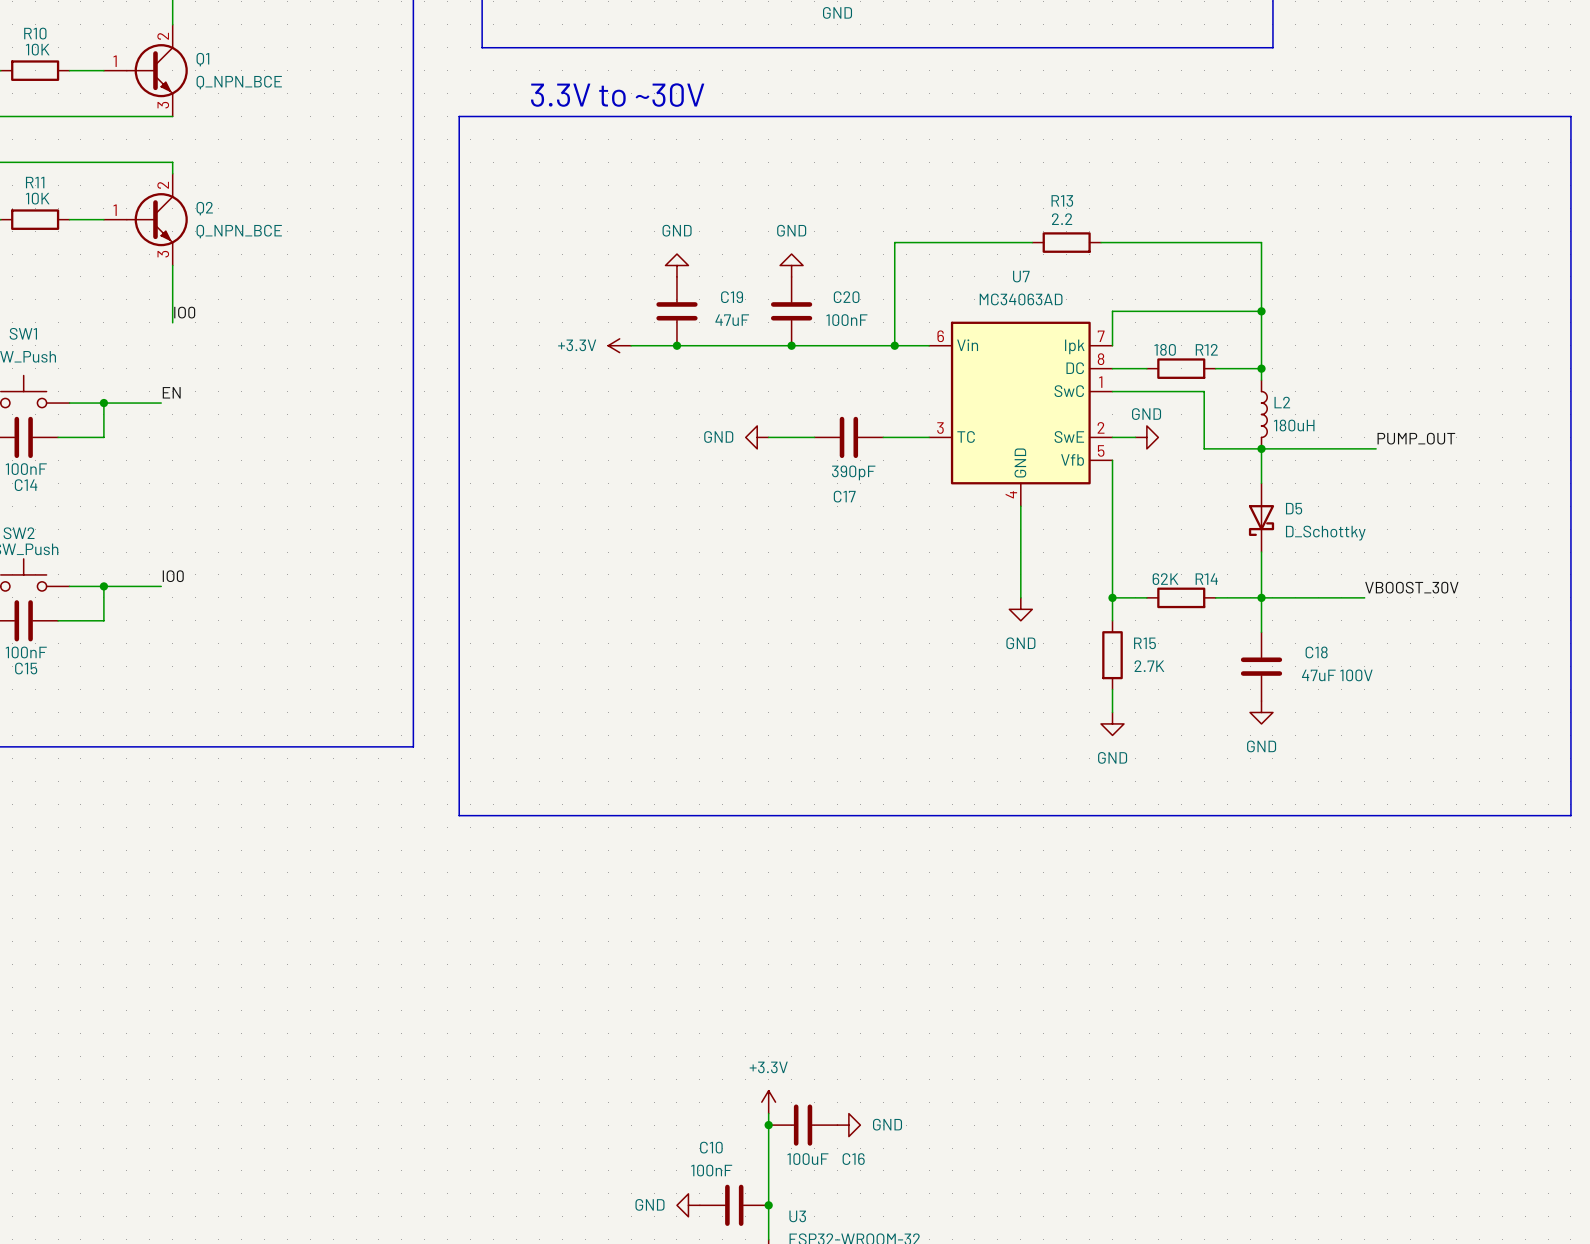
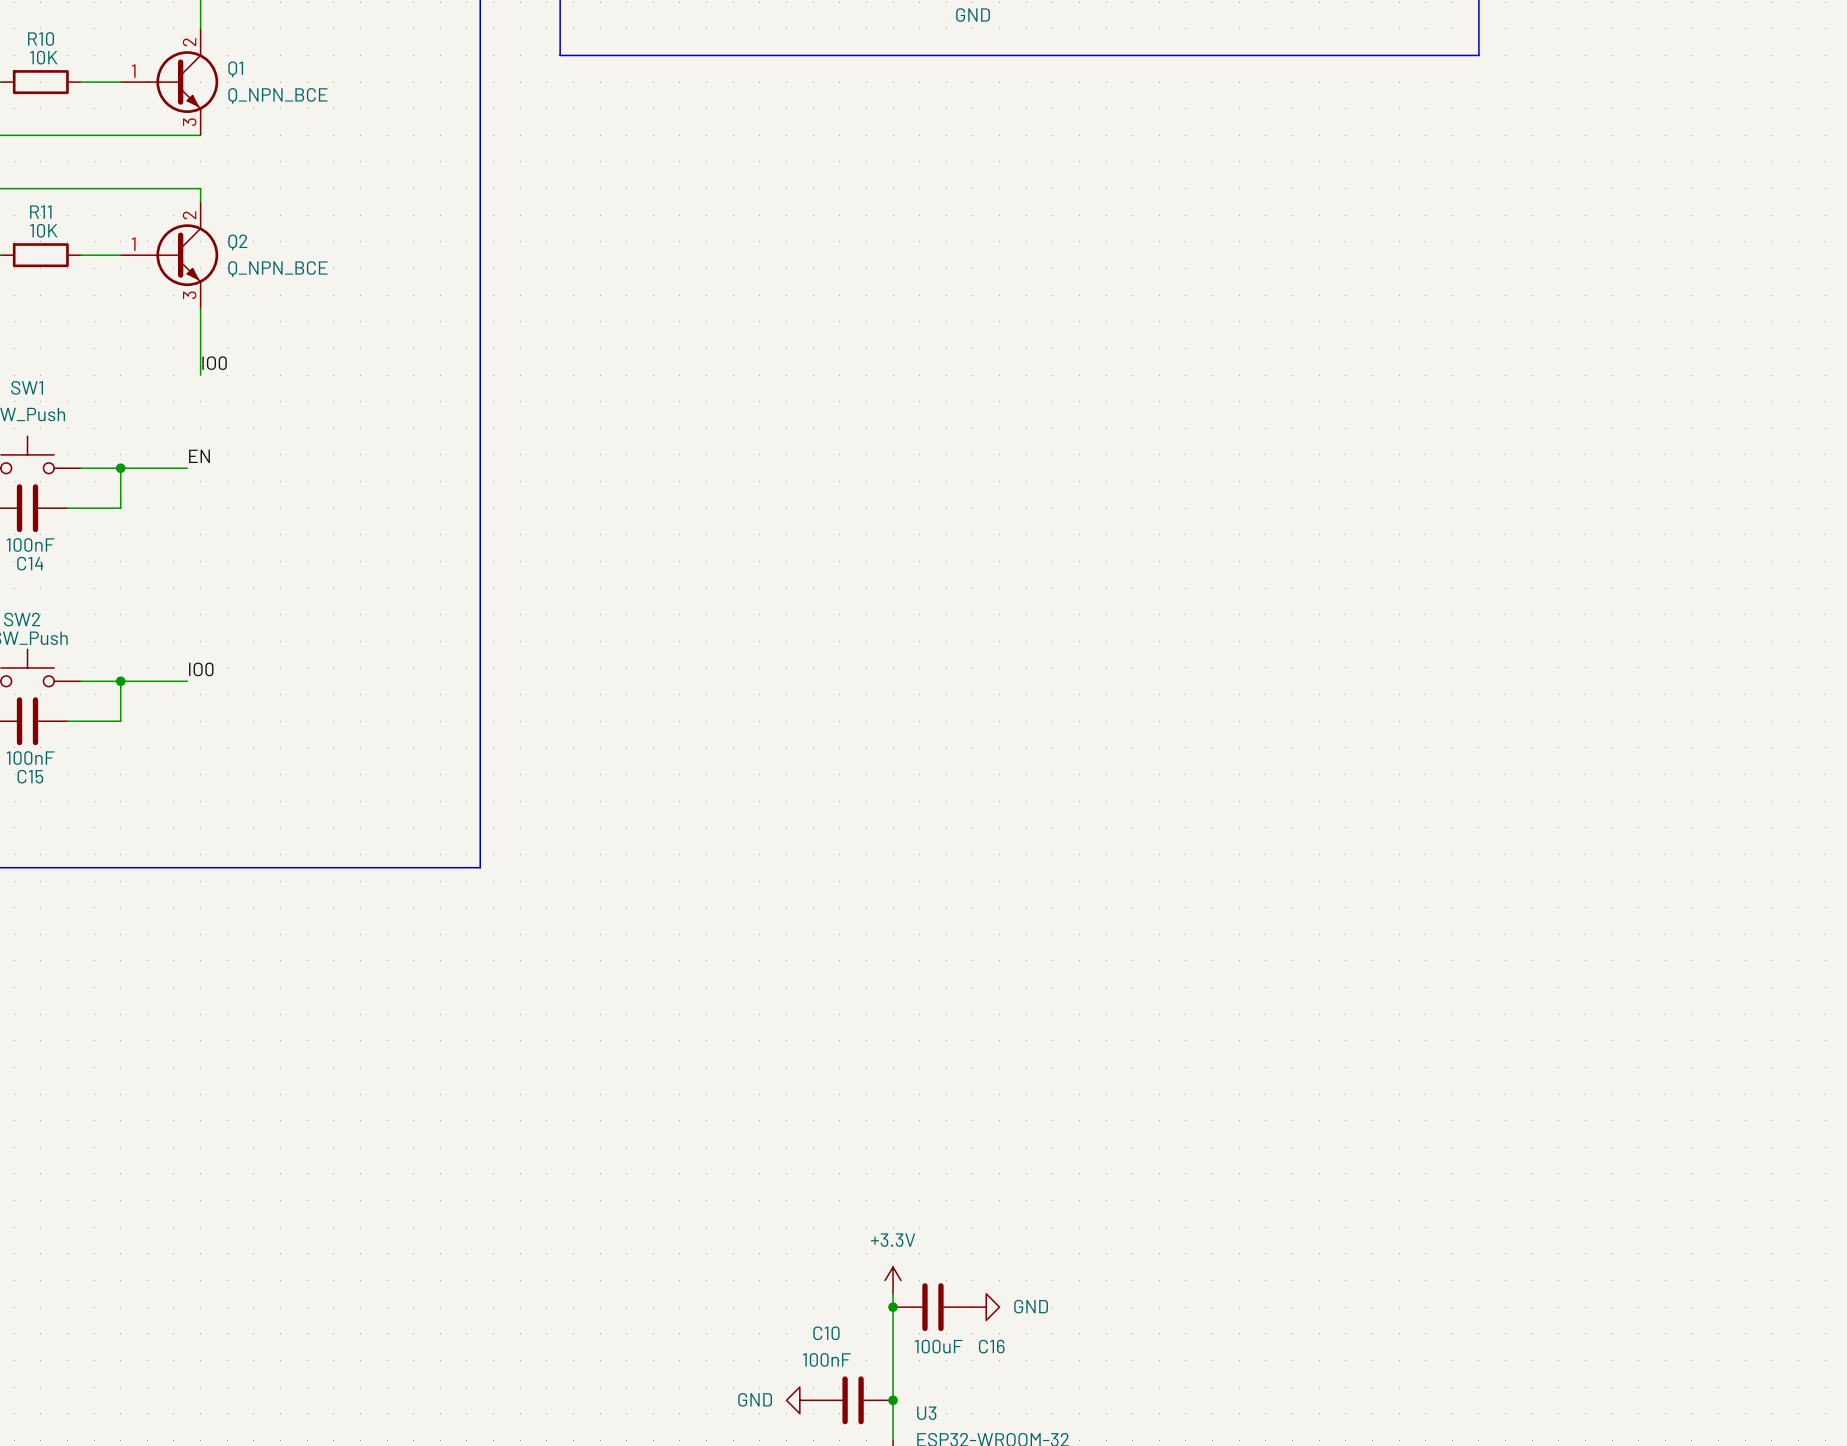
text: 3.3V to ~30V (617, 95) -> none
line: (459, 116) (1570, 116) (1570, 815) (459, 815) (459, 116) -> none
wire: (1032, 242) (894, 242) (894, 345) -> none
R13: 2.2 (1066, 242) -> none
wire: (1101, 242) (1261, 242) (1261, 380) -> none
power symbol: GND (676, 265) -> none
power symbol: GND (791, 265) -> none
C19: 47uF (676, 311) -> none
C20: 100nF (791, 311) -> none
wire: (1261, 311) (1112, 311) (1112, 345) -> none
junction: (1261, 311) -> none
power symbol: +3.3V (619, 345) -> none
wire: (631, 345) (929, 345) -> none
junction: (676, 345) -> none
junction: (791, 345) -> none
junction: (894, 345) -> none
wire: (1112, 368) (1146, 368) -> none
R12: 180 (1181, 368) -> none
wire: (1215, 368) (1261, 368) -> none
junction: (1261, 368) -> none
wire: (1112, 391) (1204, 391) (1204, 448) (1376, 448) -> none
U7: MC34063AD (1020, 413) -> none
L2: 180uH (1264, 414) -> none
power symbol: GND (757, 437) -> none
wire: (768, 437) (814, 437) -> none
C17: 390pF (848, 437) -> none
wire: (883, 437) (929, 437) -> none
wire: (1112, 437) (1135, 437) -> none
power symbol: GND (1146, 437) -> none
label: PUMP_OUT (1416, 438) -> none
wire: (1261, 448) (1261, 483) -> none
junction: (1261, 448) -> none
wire: (1112, 460) (1112, 620) -> none
wire: (1020, 506) (1020, 597) -> none
D5: D_Schottky (1261, 517) -> none
wire: (1261, 552) (1261, 632) -> none
label: VBOOST_30V (1411, 587) -> none
wire: (1112, 597) (1146, 597) -> none
junction: (1112, 597) -> none
R14: 62K (1181, 597) -> none
wire: (1215, 597) (1364, 597) -> none
junction: (1261, 597) -> none
power symbol: GND (1020, 609) -> none
R15: 2.7K (1112, 655) -> none
C18: 47uF 100V (1261, 666) -> none
wire: (1112, 689) (1112, 712) -> none
power symbol: GND (1261, 712) -> none
power symbol: GND (1112, 723) -> none

